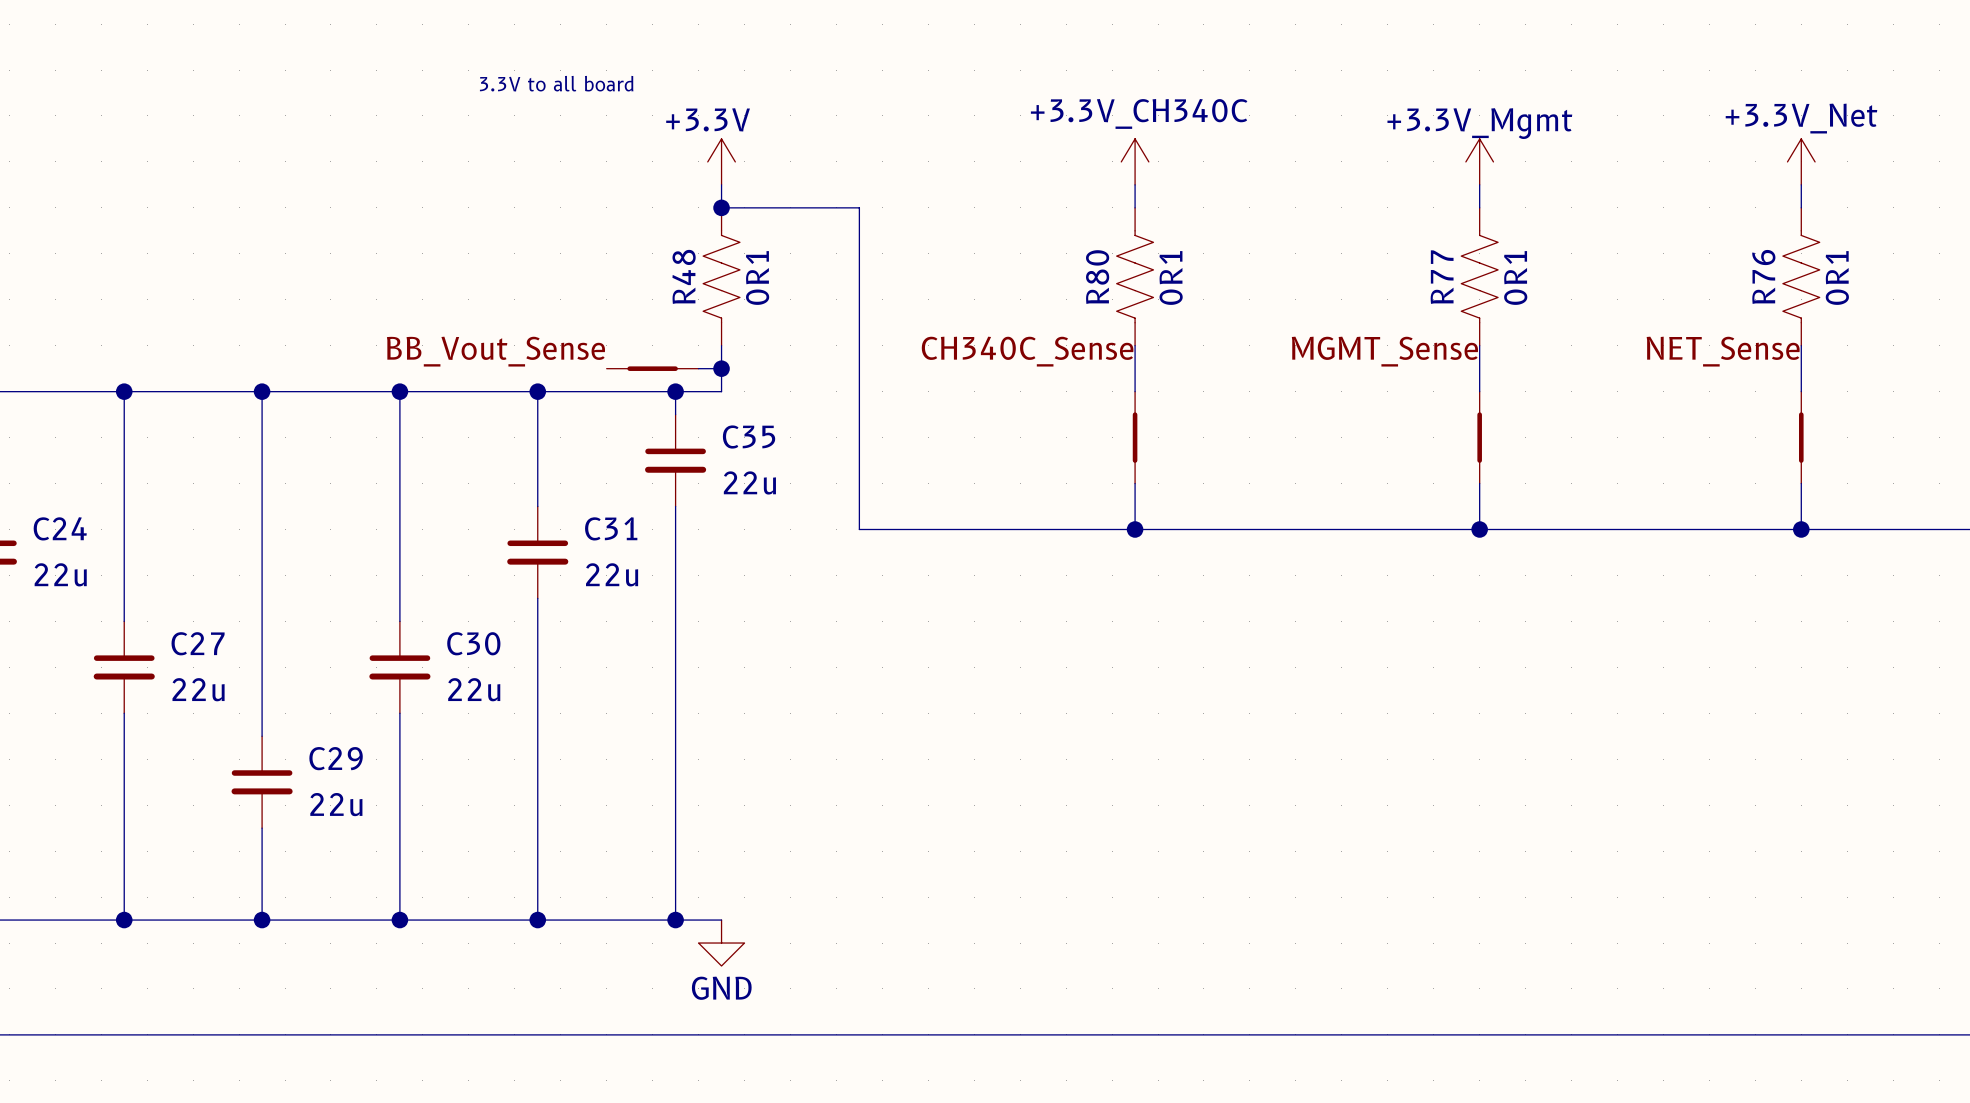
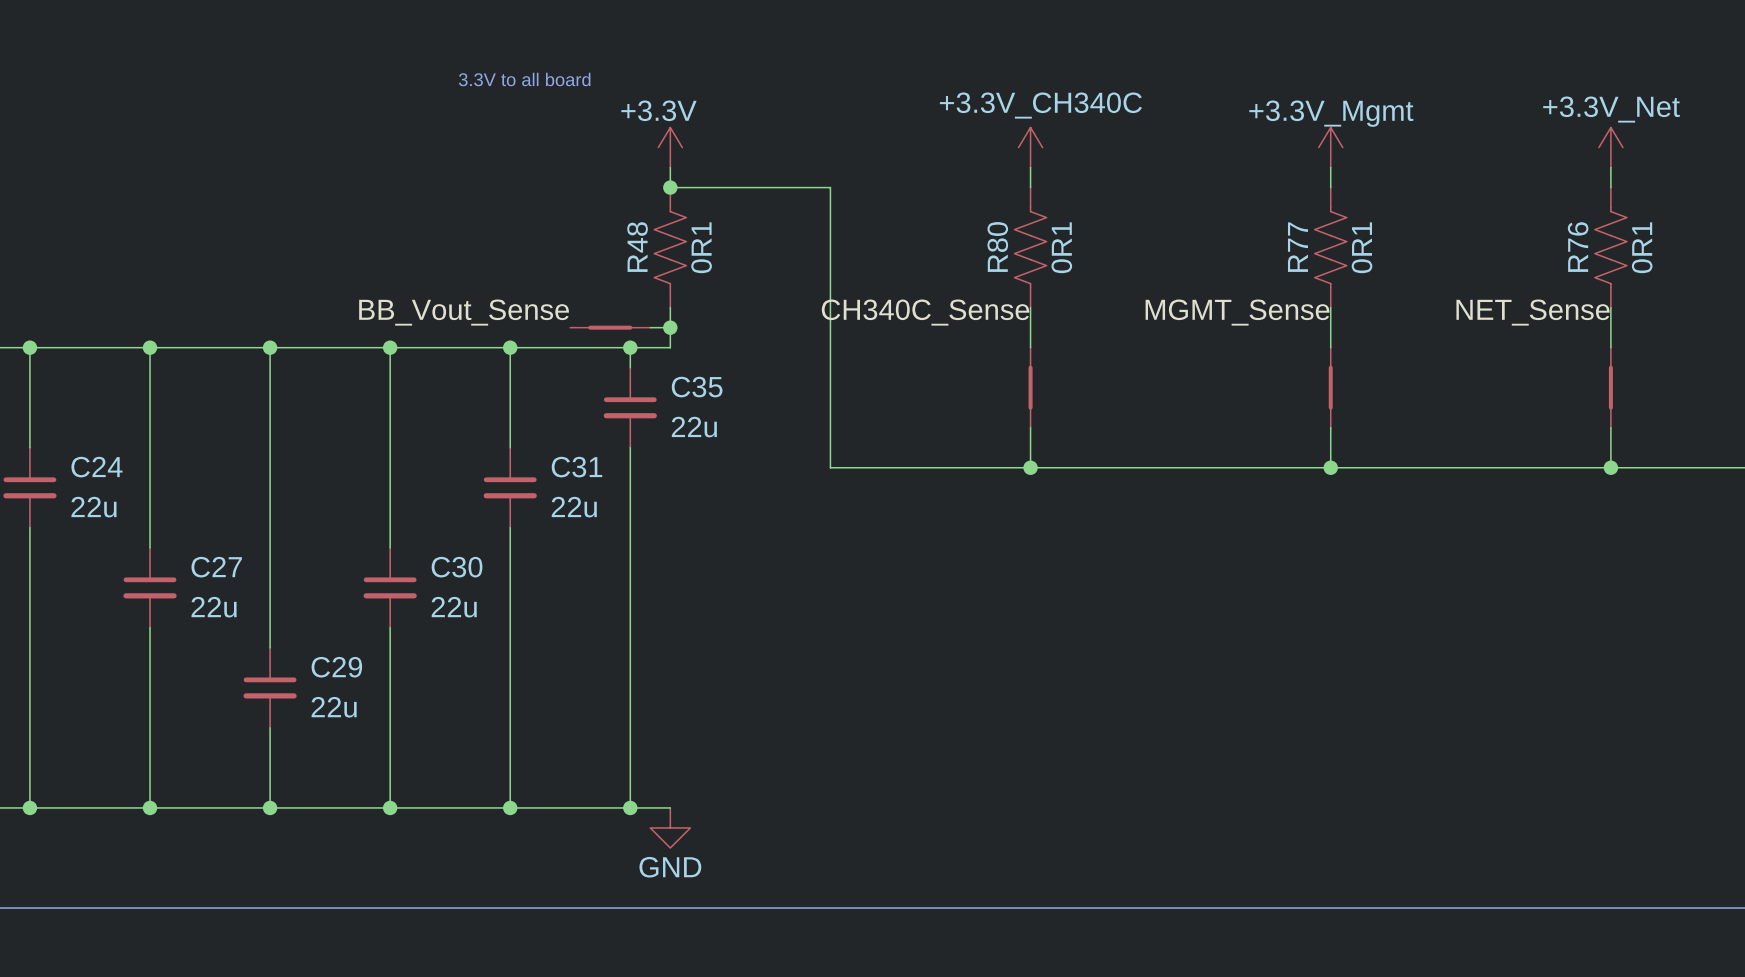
wire: (859, 207) (859, 529) (905, 529) -> (790, 187) (830, 187) (830, 467)

